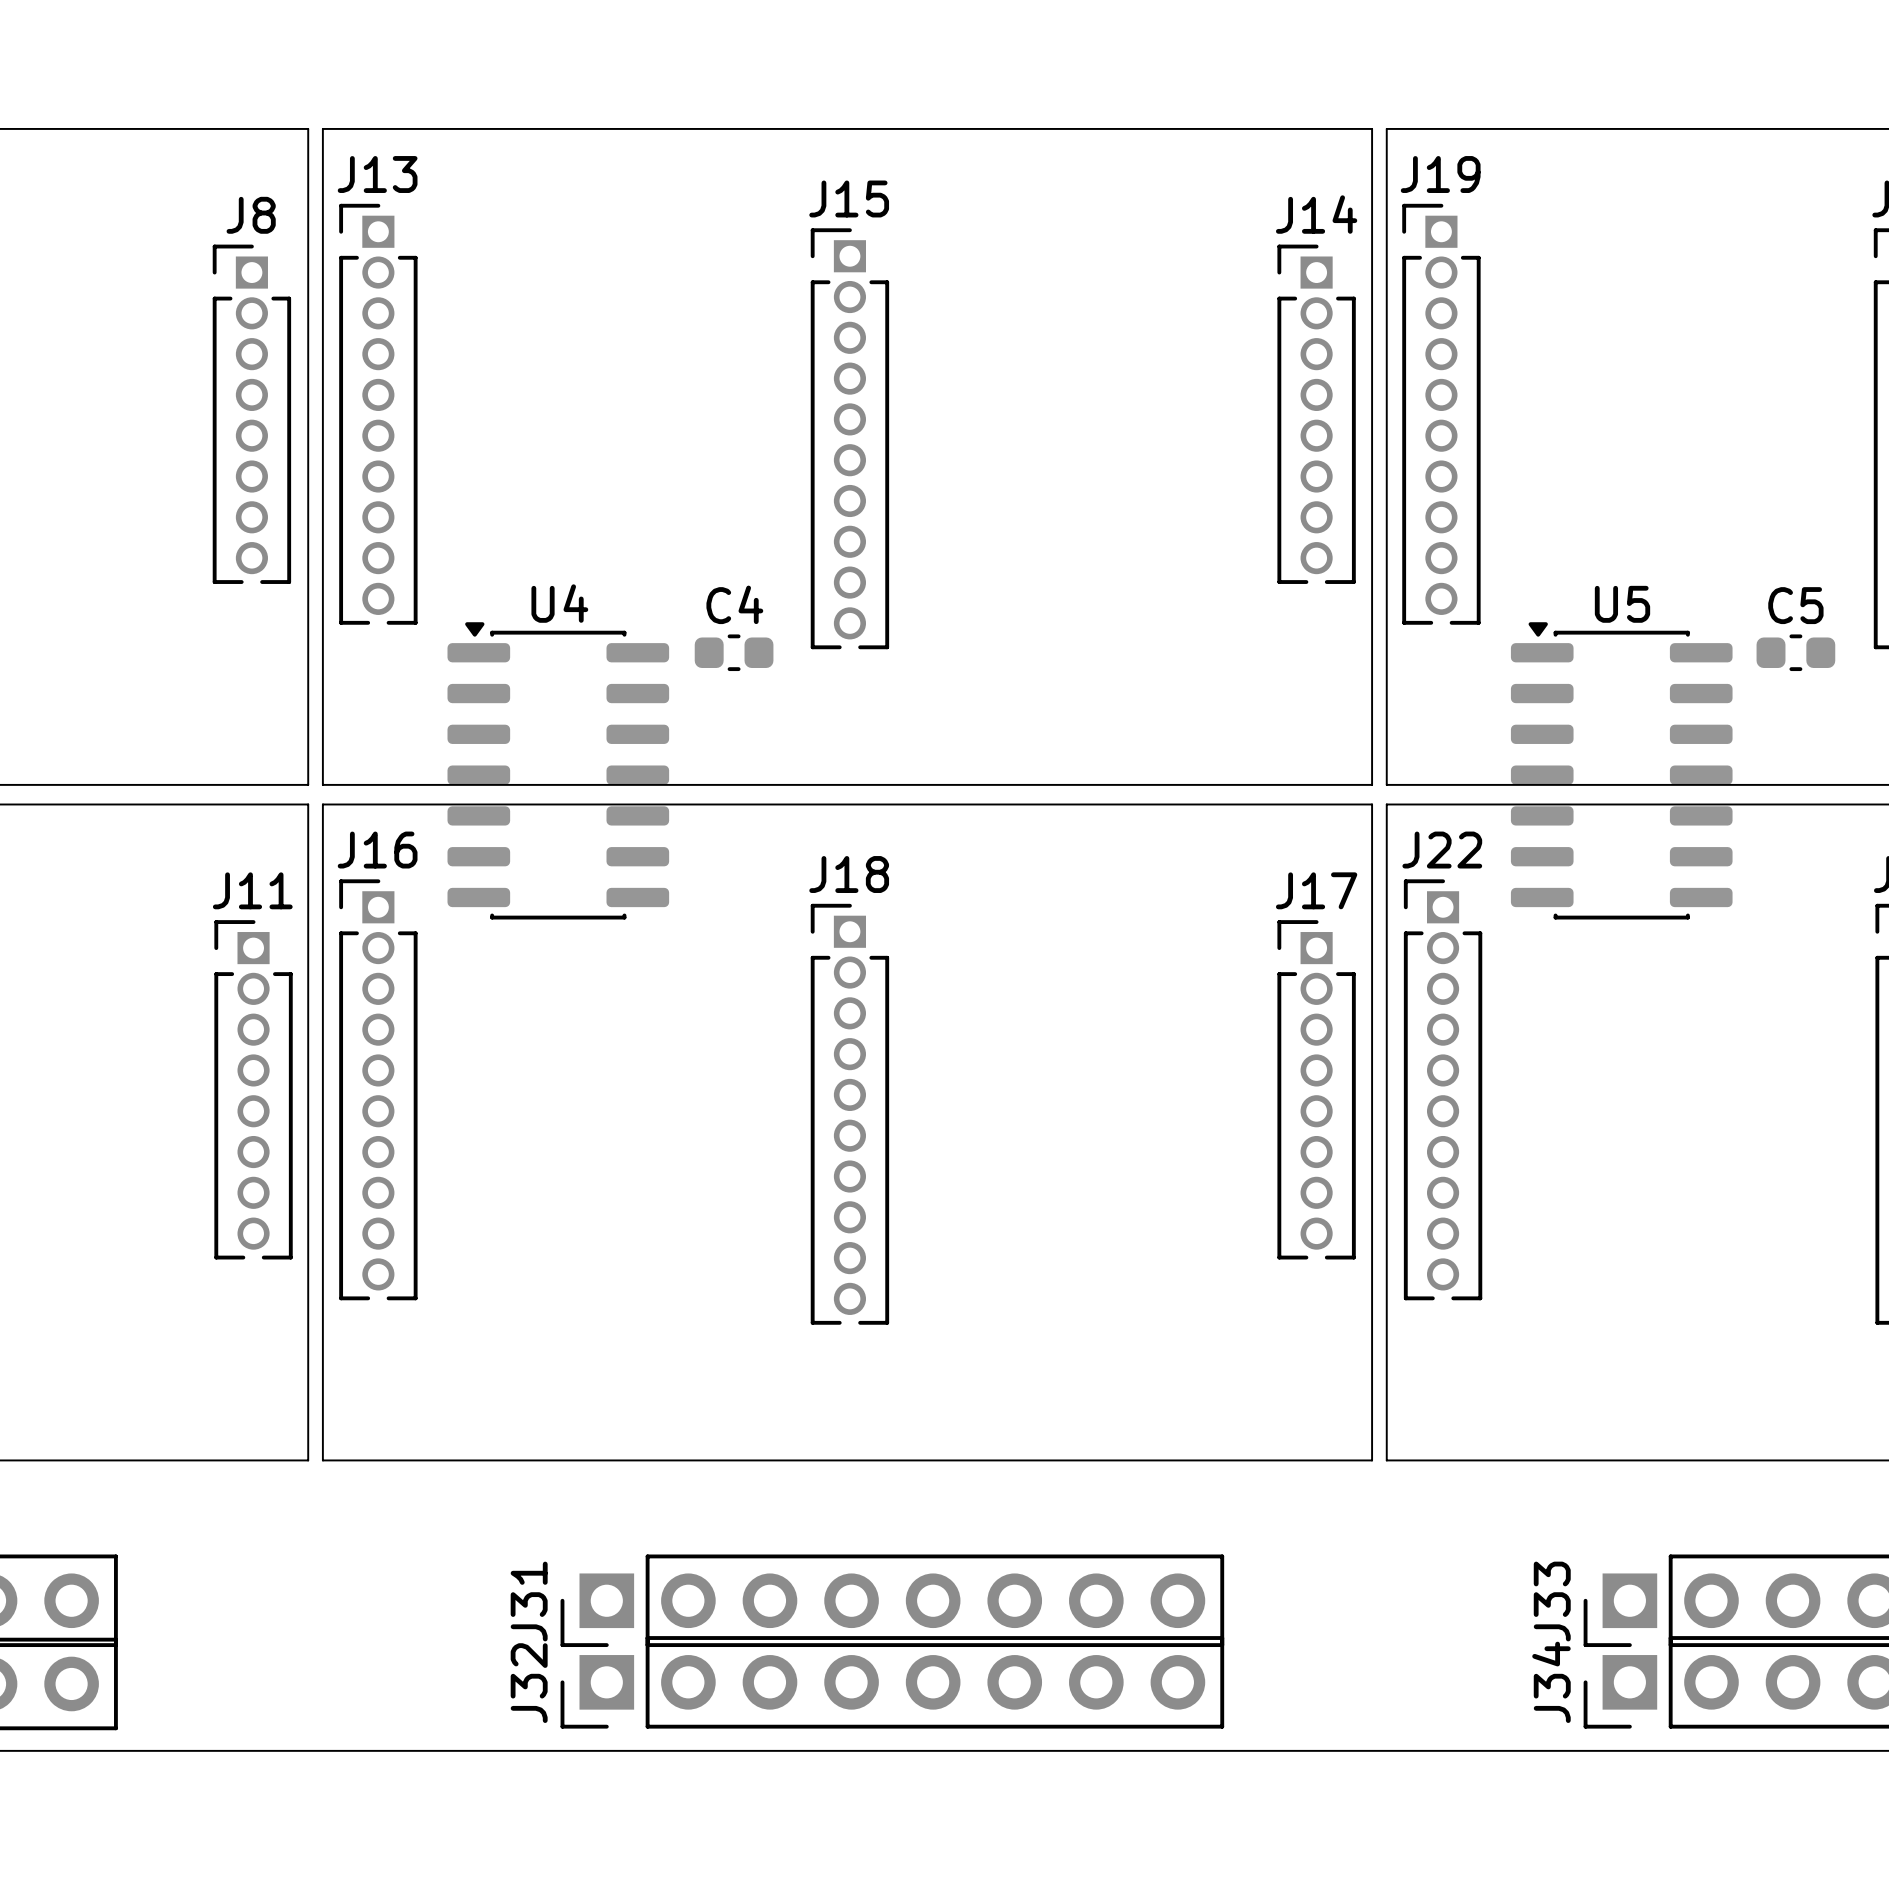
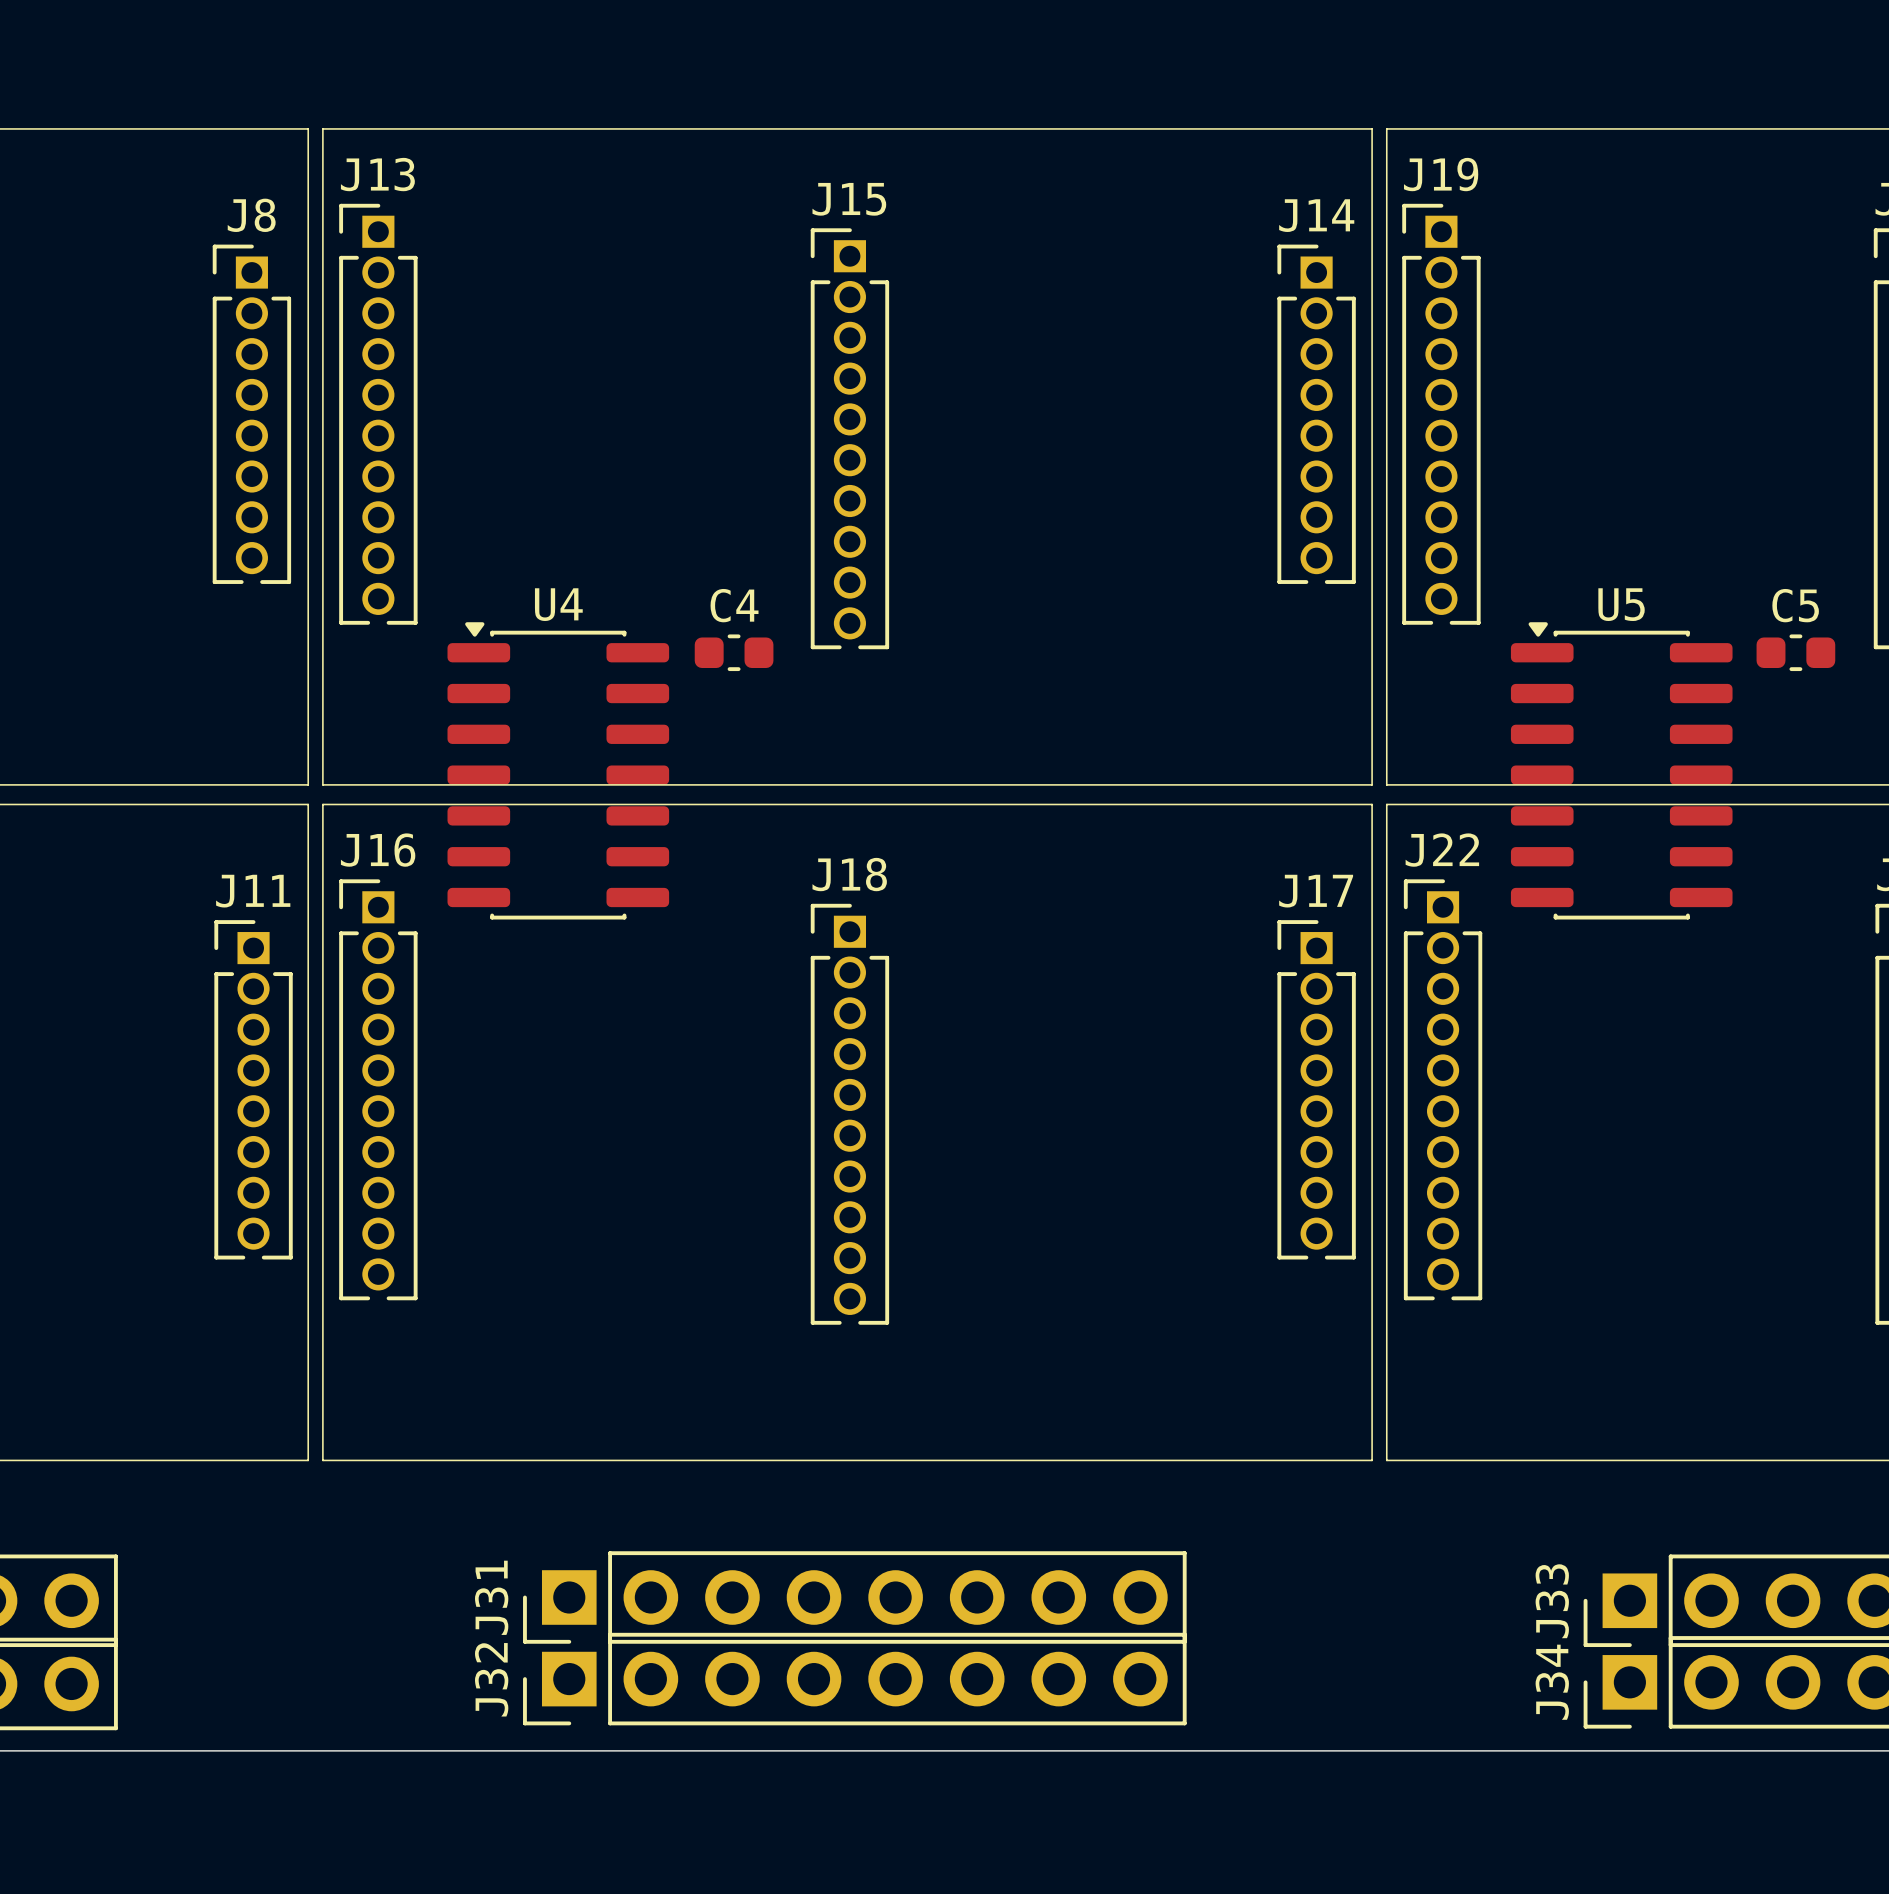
J31 position: (892, 1600) -> (854, 1597)
J32 position: (892, 1682) -> (854, 1679)

